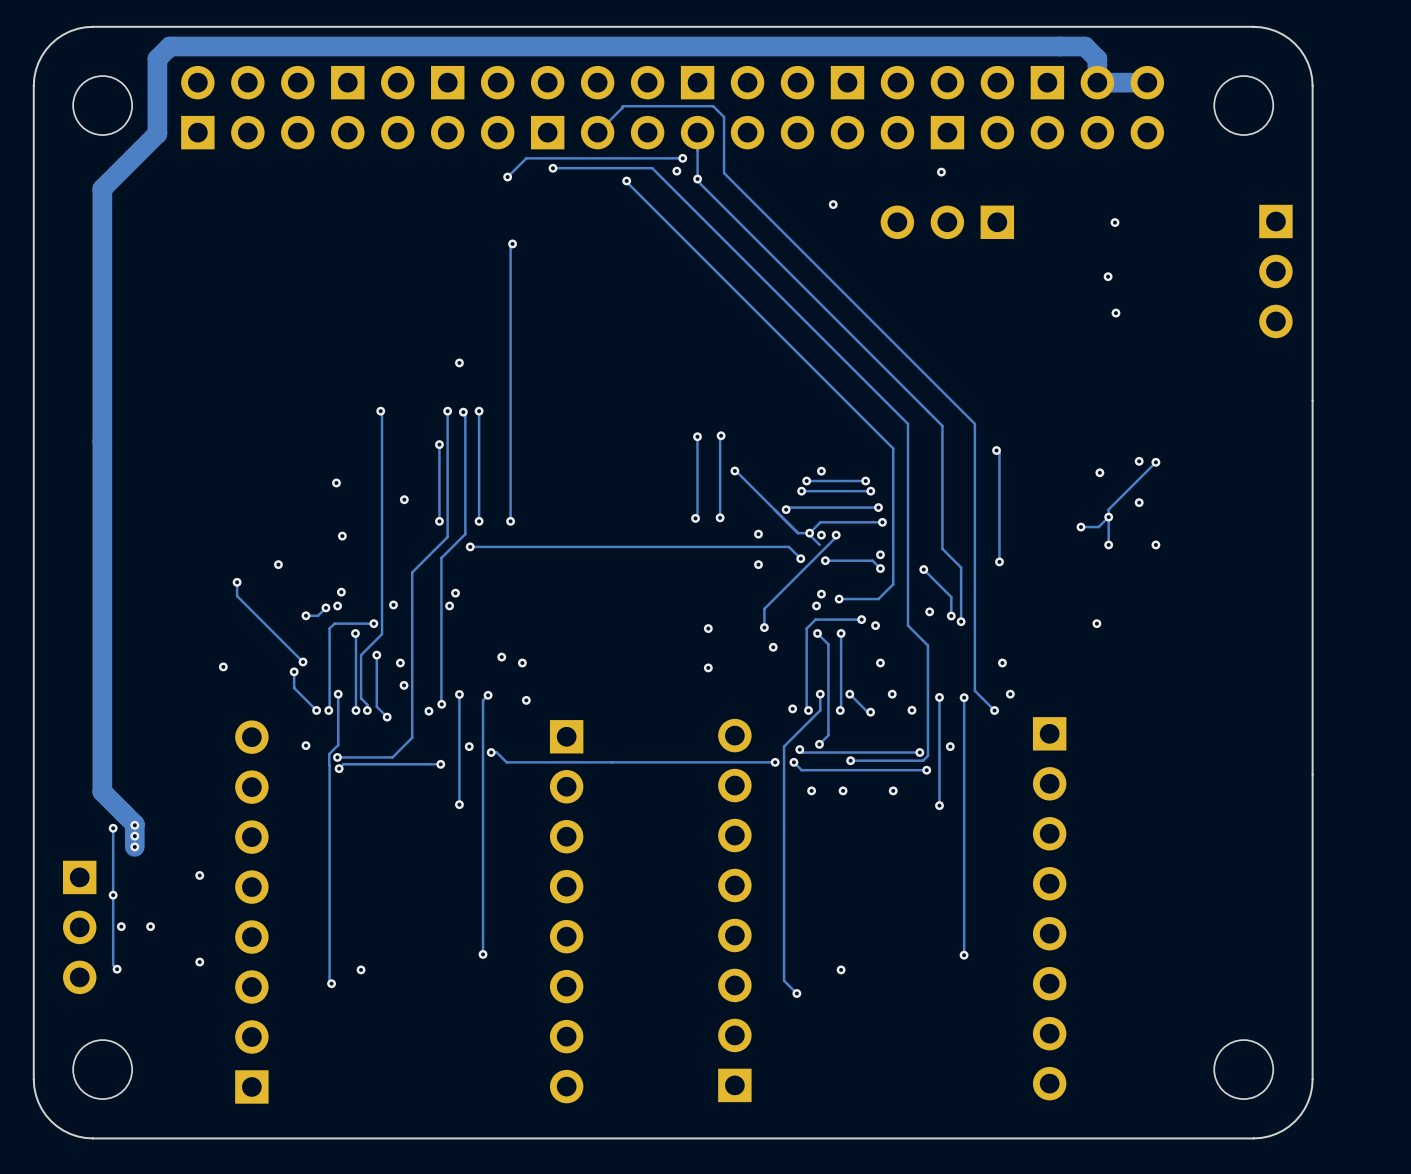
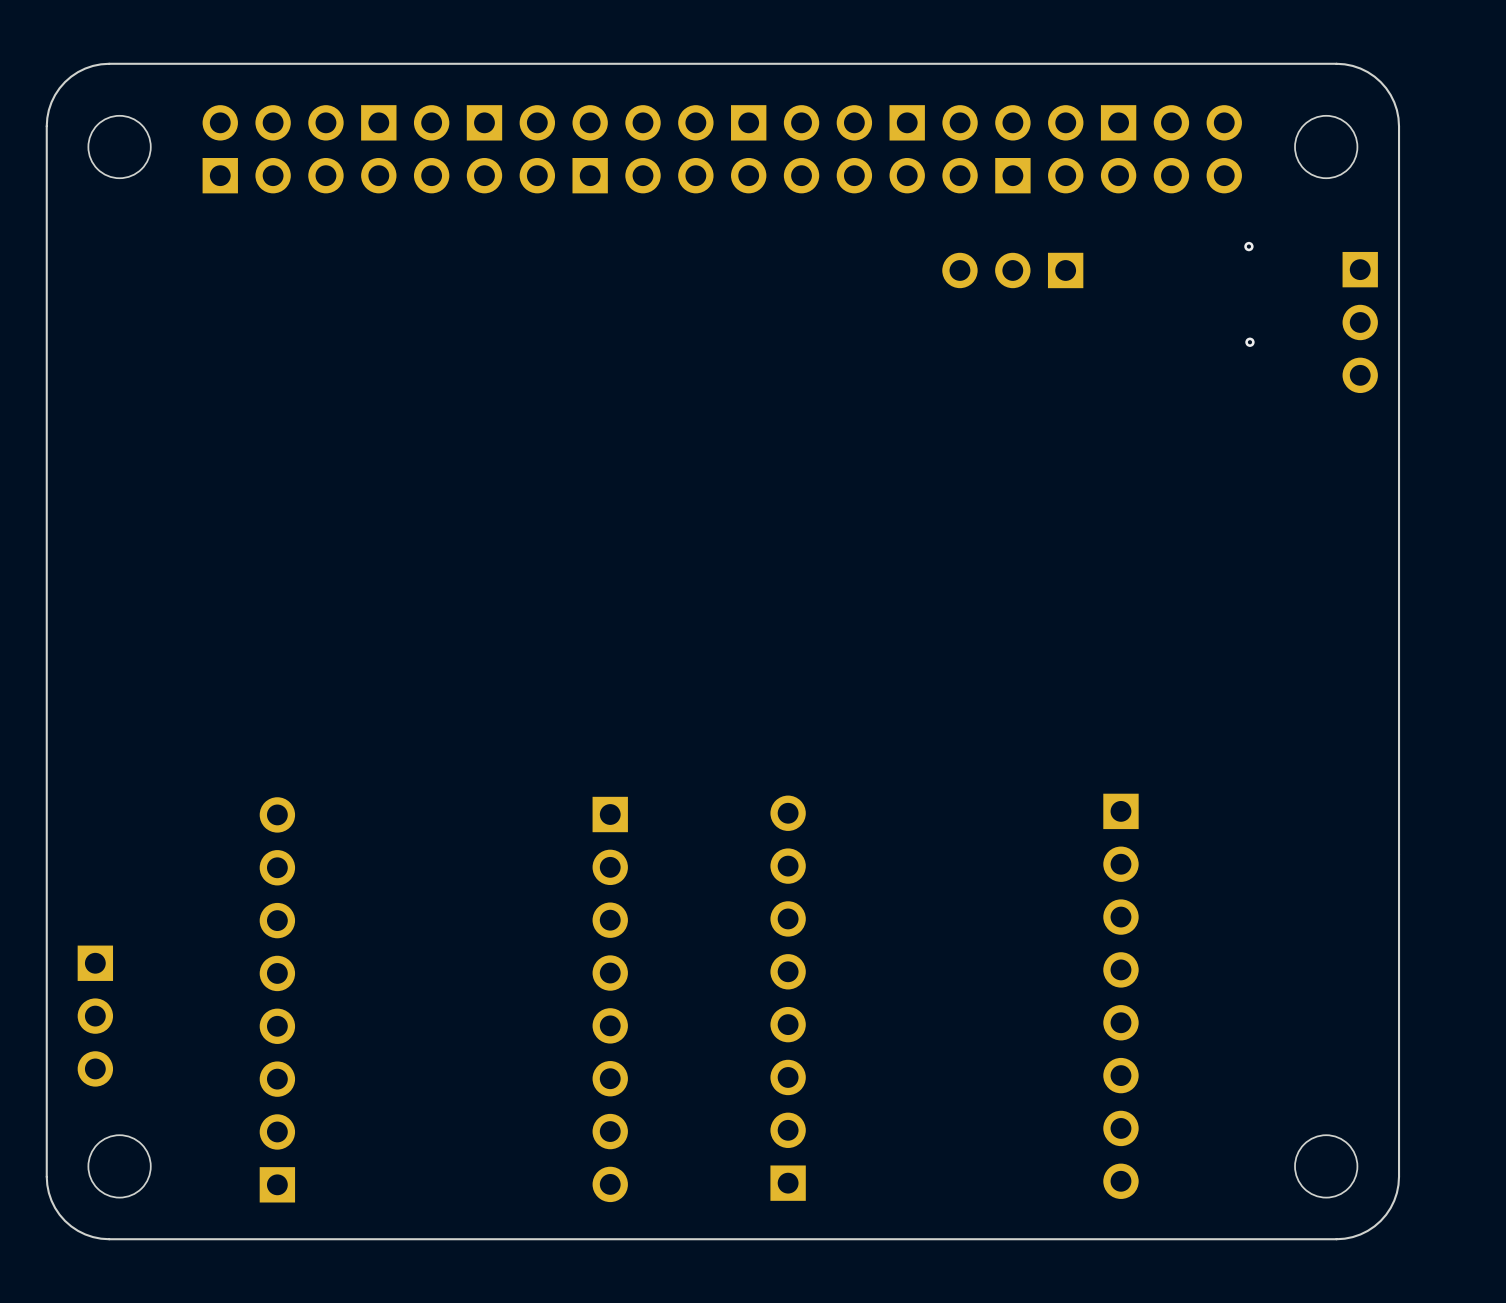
track: (1147, 82) (1097, 82) (1097, 59) (1084, 46) (169, 46) (157, 58) (157, 133) (102, 188) (102, 791) (134, 824) (134, 846) -> none
track: (597, 132) (622, 106) (713, 106) (724, 117) (724, 173) (974, 423) (974, 690) (994, 710) -> none
track: (697, 132) (697, 181) (942, 425) (942, 548) (961, 567) (961, 621) -> none
track: (682, 158) (526, 158) (507, 177) -> none
via: (682, 158) -> none
via: (552, 168) -> none
track: (553, 168) (652, 168) (908, 423) (908, 625) (927, 645) (927, 755) (923, 760) (850, 760) -> none
via: (676, 171) -> none
via: (941, 172) -> none
via: (507, 177) -> none
via: (697, 179) -> none
track: (626, 180) (893, 448) (893, 584) (878, 599) (839, 599) -> none
via: (626, 180) -> none
via: none -> (1248, 246)
via: (833, 204) -> none
via: (1114, 222) -> none
track: (512, 243) (510, 245) (510, 521) -> none
via: (512, 243) -> none
via: (1108, 276) -> none
via: none -> (1249, 342)
via: (1115, 313) -> none
via: (459, 362) -> none
track: (380, 411) (382, 634) (361, 655) (361, 698) (367, 704) (367, 710) -> none
via: (380, 411) -> none
track: (447, 411) (447, 537) (412, 572) (412, 737) (392, 757) (337, 757) -> none
via: (447, 411) -> none
track: (479, 411) (479, 521) -> none
via: (479, 411) -> none
track: (463, 412) (465, 414) (465, 534) (441, 558) (441, 704) -> none
via: (463, 412) -> none
track: (721, 435) (720, 517) -> none
via: (721, 435) -> none
track: (697, 436) (697, 516) (695, 518) -> none
via: (697, 436) -> none
track: (439, 444) (439, 521) -> none
via: (439, 444) -> none
track: (996, 450) (999, 453) (999, 561) -> none
via: (996, 450) -> none
via: (1139, 461) -> none
track: (1155, 462) (1108, 509) (1108, 544) -> none
via: (1155, 462) -> none
track: (734, 470) (798, 533) (809, 533) -> none
via: (734, 470) -> none
via: (821, 471) -> none
via: (1099, 472) -> none
via: (806, 481) -> none
track: (865, 481) (806, 481) -> none
via: (865, 481) -> none
via: (336, 482) -> none
via: (801, 491) -> none
track: (870, 491) (801, 491) -> none
via: (870, 491) -> none
via: (404, 499) -> none
via: (1139, 502) -> none
track: (878, 507) (788, 507) (786, 509) -> none
via: (878, 507) -> none
via: (786, 509) -> none
via: (720, 517) -> none
track: (1108, 517) (1098, 527) (1080, 527) -> none
via: (1108, 517) -> none
via: (695, 518) -> none
via: (439, 521) -> none
via: (479, 521) -> none
via: (510, 521) -> none
track: (882, 522) (820, 522) (809, 533) -> none
via: (882, 522) -> none
via: (1080, 527) -> none
track: (809, 533) (819, 544) -> none
via: (809, 533) -> none
via: (758, 534) -> none
via: (821, 535) -> none
track: (836, 535) (764, 608) (764, 627) -> none
via: (836, 535) -> none
via: (342, 536) -> none
via: (1108, 544) -> none
via: (1155, 544) -> none
track: (470, 546) (788, 546) (800, 558) -> none
via: (470, 546) -> none
via: (880, 554) -> none
via: (800, 558) -> none
track: (825, 560) (872, 560) (880, 568) -> none
via: (825, 560) -> none
via: (999, 561) -> none
via: (278, 564) -> none
via: (758, 564) -> none
via: (880, 568) -> none
track: (923, 569) (951, 597) (951, 615) -> none
via: (923, 569) -> none
track: (237, 582) (237, 596) (303, 661) -> none
via: (237, 582) -> none
via: (341, 592) -> none
via: (455, 593) -> none
via: (821, 594) -> none
via: (839, 599) -> none
via: (393, 604) -> none
via: (337, 605) -> none
via: (449, 605) -> none
via: (816, 605) -> none
track: (325, 607) (318, 615) (305, 615) -> none
via: (325, 607) -> none
via: (929, 611) -> none
via: (305, 615) -> none
via: (951, 615) -> none
track: (861, 619) (815, 619) (806, 628) (806, 708) (808, 710) -> none
via: (861, 619) -> none
via: (961, 621) -> none
track: (373, 623) (334, 623) (329, 628) (328, 710) -> none
via: (373, 623) -> none
via: (1096, 623) -> none
via: (875, 625) -> none
via: (764, 627) -> none
via: (708, 628) -> none
track: (355, 633) (356, 710) -> none
via: (355, 633) -> none
track: (817, 633) (828, 644) (828, 735) (819, 744) -> none
via: (817, 633) -> none
track: (841, 633) (840, 710) -> none
via: (841, 633) -> none
via: (773, 647) -> none
track: (376, 655) (376, 706) (387, 717) -> none
via: (376, 655) -> none
via: (501, 657) -> none
via: (303, 661) -> none
via: (400, 662) -> none
via: (522, 662) -> none
via: (880, 662) -> none
via: (1002, 662) -> none
via: (223, 666) -> none
via: (708, 667) -> none
track: (294, 671) (294, 688) (316, 710) -> none
via: (294, 671) -> none
via: (404, 685) -> none
track: (338, 694) (338, 745) (329, 754) (329, 981) (331, 983) -> none
via: (338, 694) -> none
track: (459, 694) (459, 804) -> none
via: (459, 694) -> none
track: (820, 694) (820, 710) (784, 746) (784, 980) (796, 993) -> none
via: (820, 694) -> none
track: (849, 694) (867, 712) (870, 712) -> none
via: (849, 694) -> none
via: (892, 694) -> none
via: (1010, 694) -> none
track: (488, 695) (483, 700) (483, 954) -> none
via: (488, 695) -> none
track: (939, 697) (939, 805) -> none
via: (939, 697) -> none
track: (964, 697) (964, 955) -> none
via: (964, 697) -> none
via: (526, 700) -> none
via: (441, 704) -> none
via: (792, 708) -> none
via: (316, 710) -> none
via: (328, 710) -> none
via: (356, 710) -> none
via: (367, 710) -> none
via: (808, 710) -> none
via: (840, 710) -> none
via: (911, 710) -> none
via: (994, 710) -> none
via: (428, 711) -> none
via: (870, 712) -> none
via: (387, 717) -> none
via: (819, 744) -> none
via: (305, 745) -> none
via: (469, 746) -> none
via: (950, 746) -> none
track: (799, 749) (802, 752) (919, 752) -> none
via: (799, 749) -> none
track: (491, 752) (496, 752) (506, 762) (775, 762) -> none
via: (491, 752) -> none
via: (919, 752) -> none
via: (337, 757) -> none
via: (850, 760) -> none
via: (775, 762) -> none
track: (793, 762) (801, 770) (926, 770) -> none
via: (793, 762) -> none
track: (440, 764) (343, 764) (339, 768) -> none
via: (440, 764) -> none
via: (339, 768) -> none
via: (926, 770) -> none
via: (811, 790) -> none
via: (843, 790) -> none
via: (893, 790) -> none
via: (459, 804) -> none
via: (939, 805) -> none
via: (134, 825) -> none
track: (113, 828) (113, 965) (117, 969) -> none
via: (113, 828) -> none
via: (134, 836) -> none
via: (134, 846) -> none
via: (199, 875) -> none
via: (113, 895) -> none
via: (121, 926) -> none
via: (150, 926) -> none
via: (483, 954) -> none
via: (964, 955) -> none
via: (199, 962) -> none
via: (117, 969) -> none
via: (361, 969) -> none
via: (841, 969) -> none
via: (331, 983) -> none
via: (796, 993) -> none

